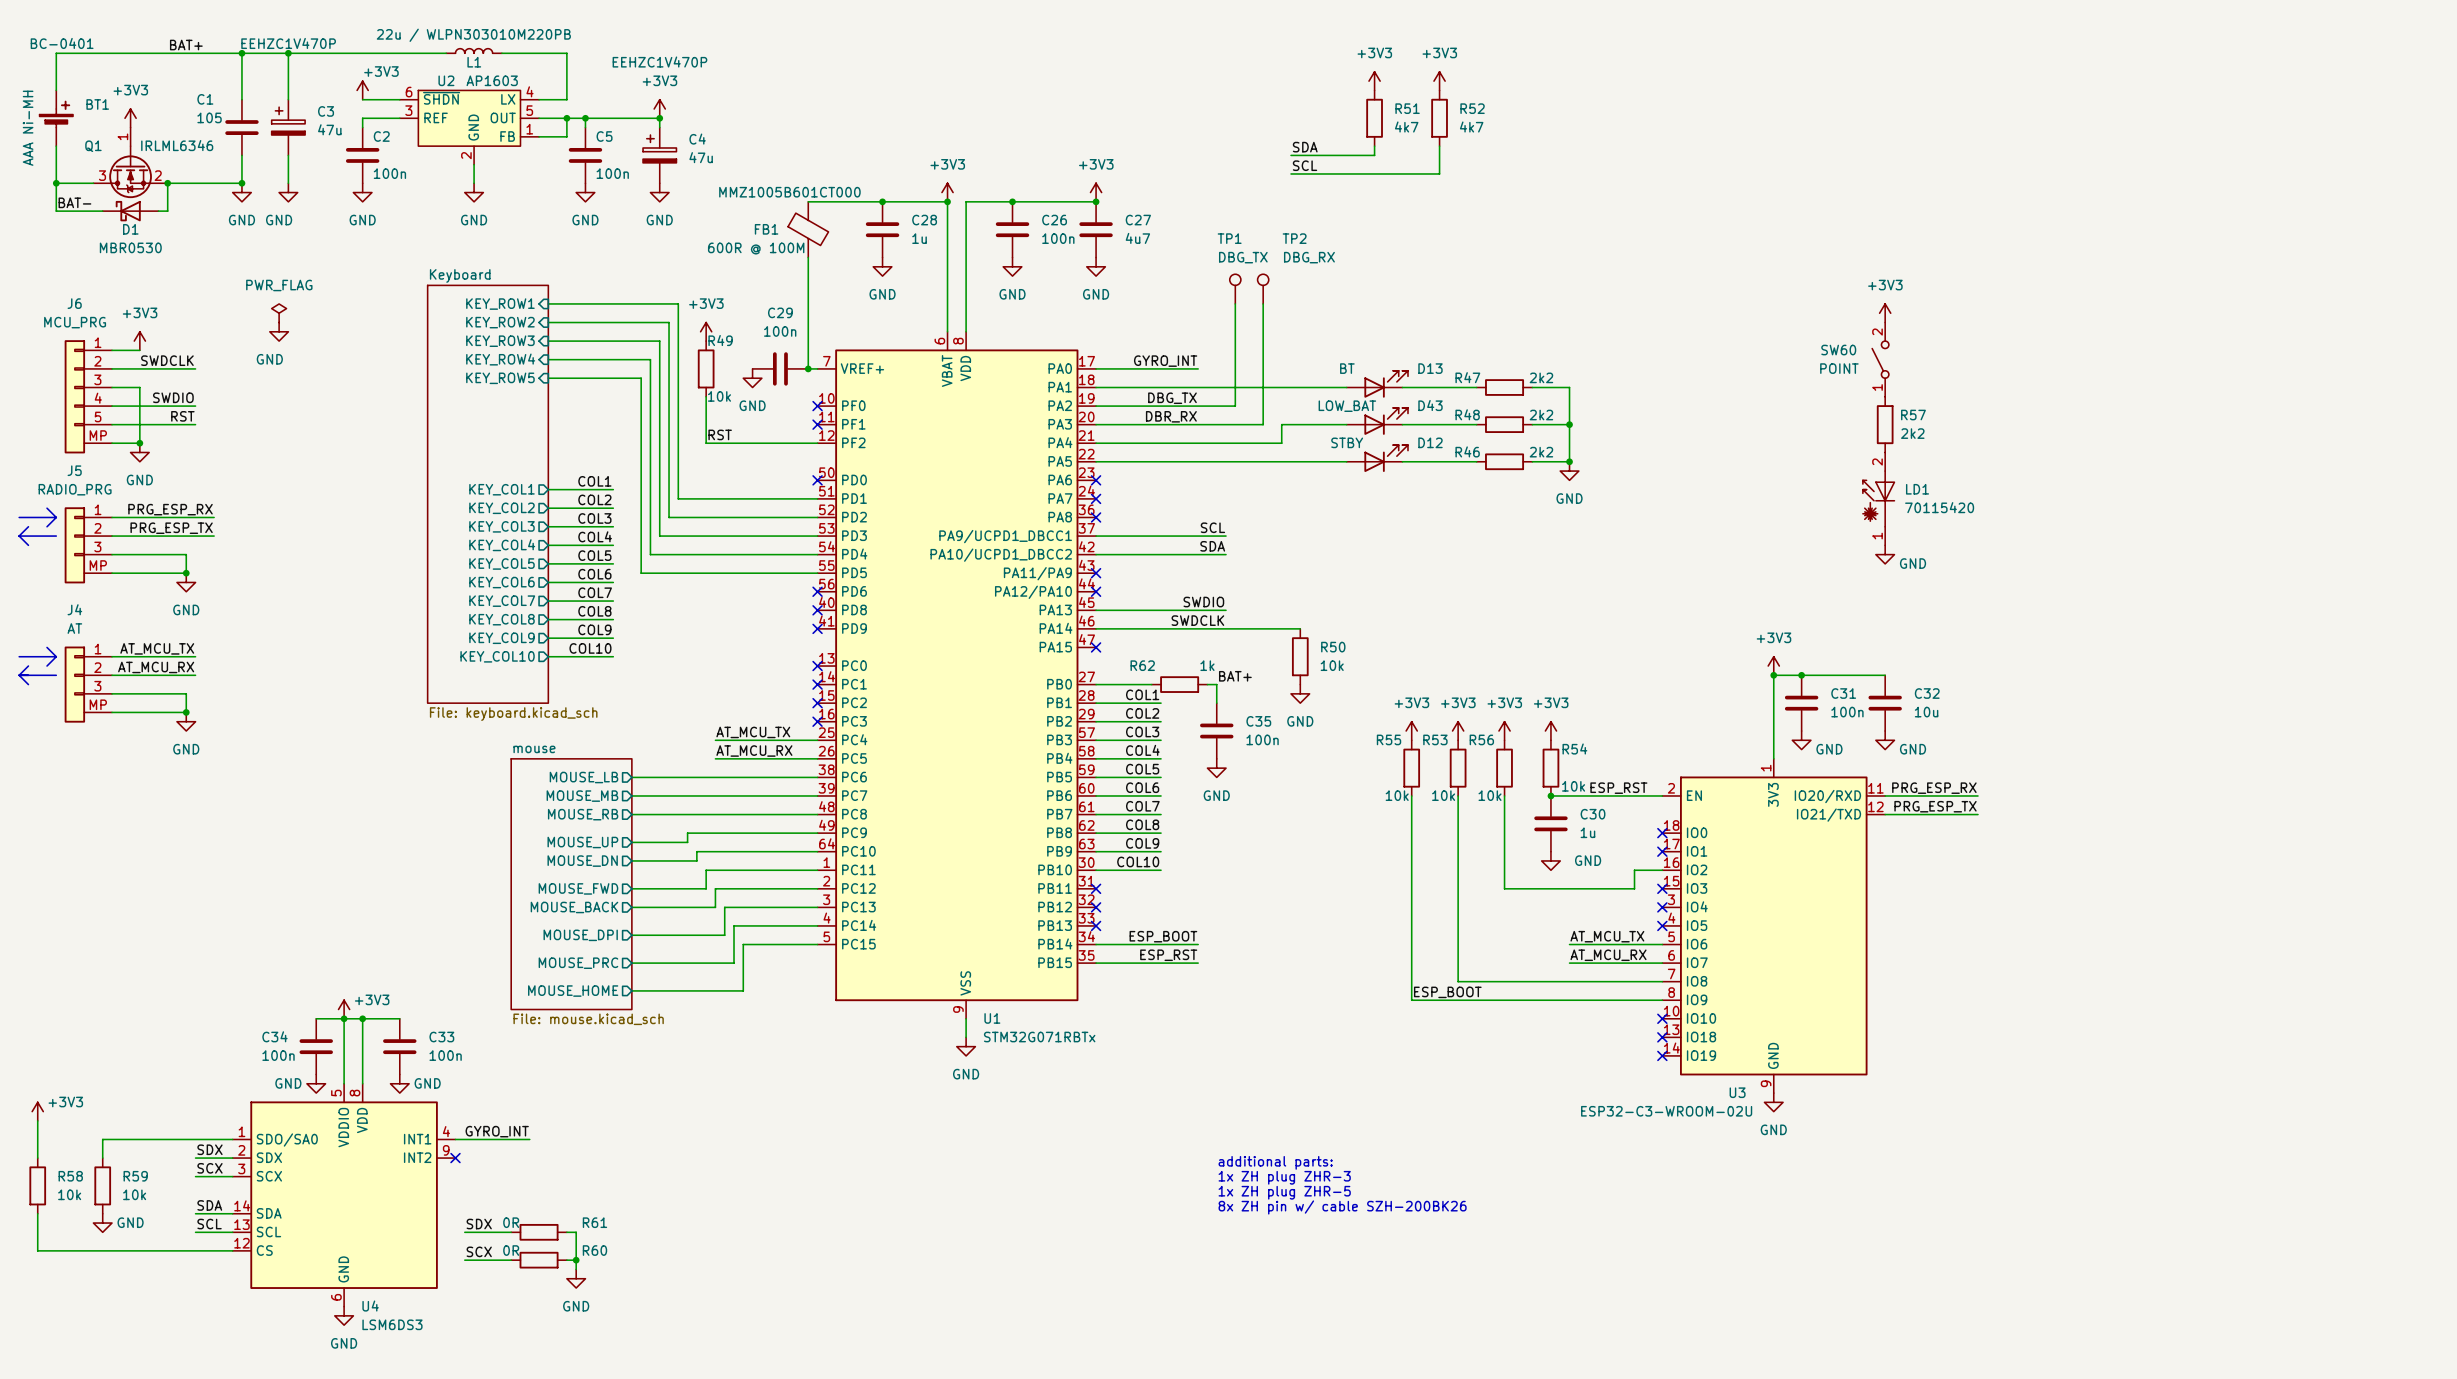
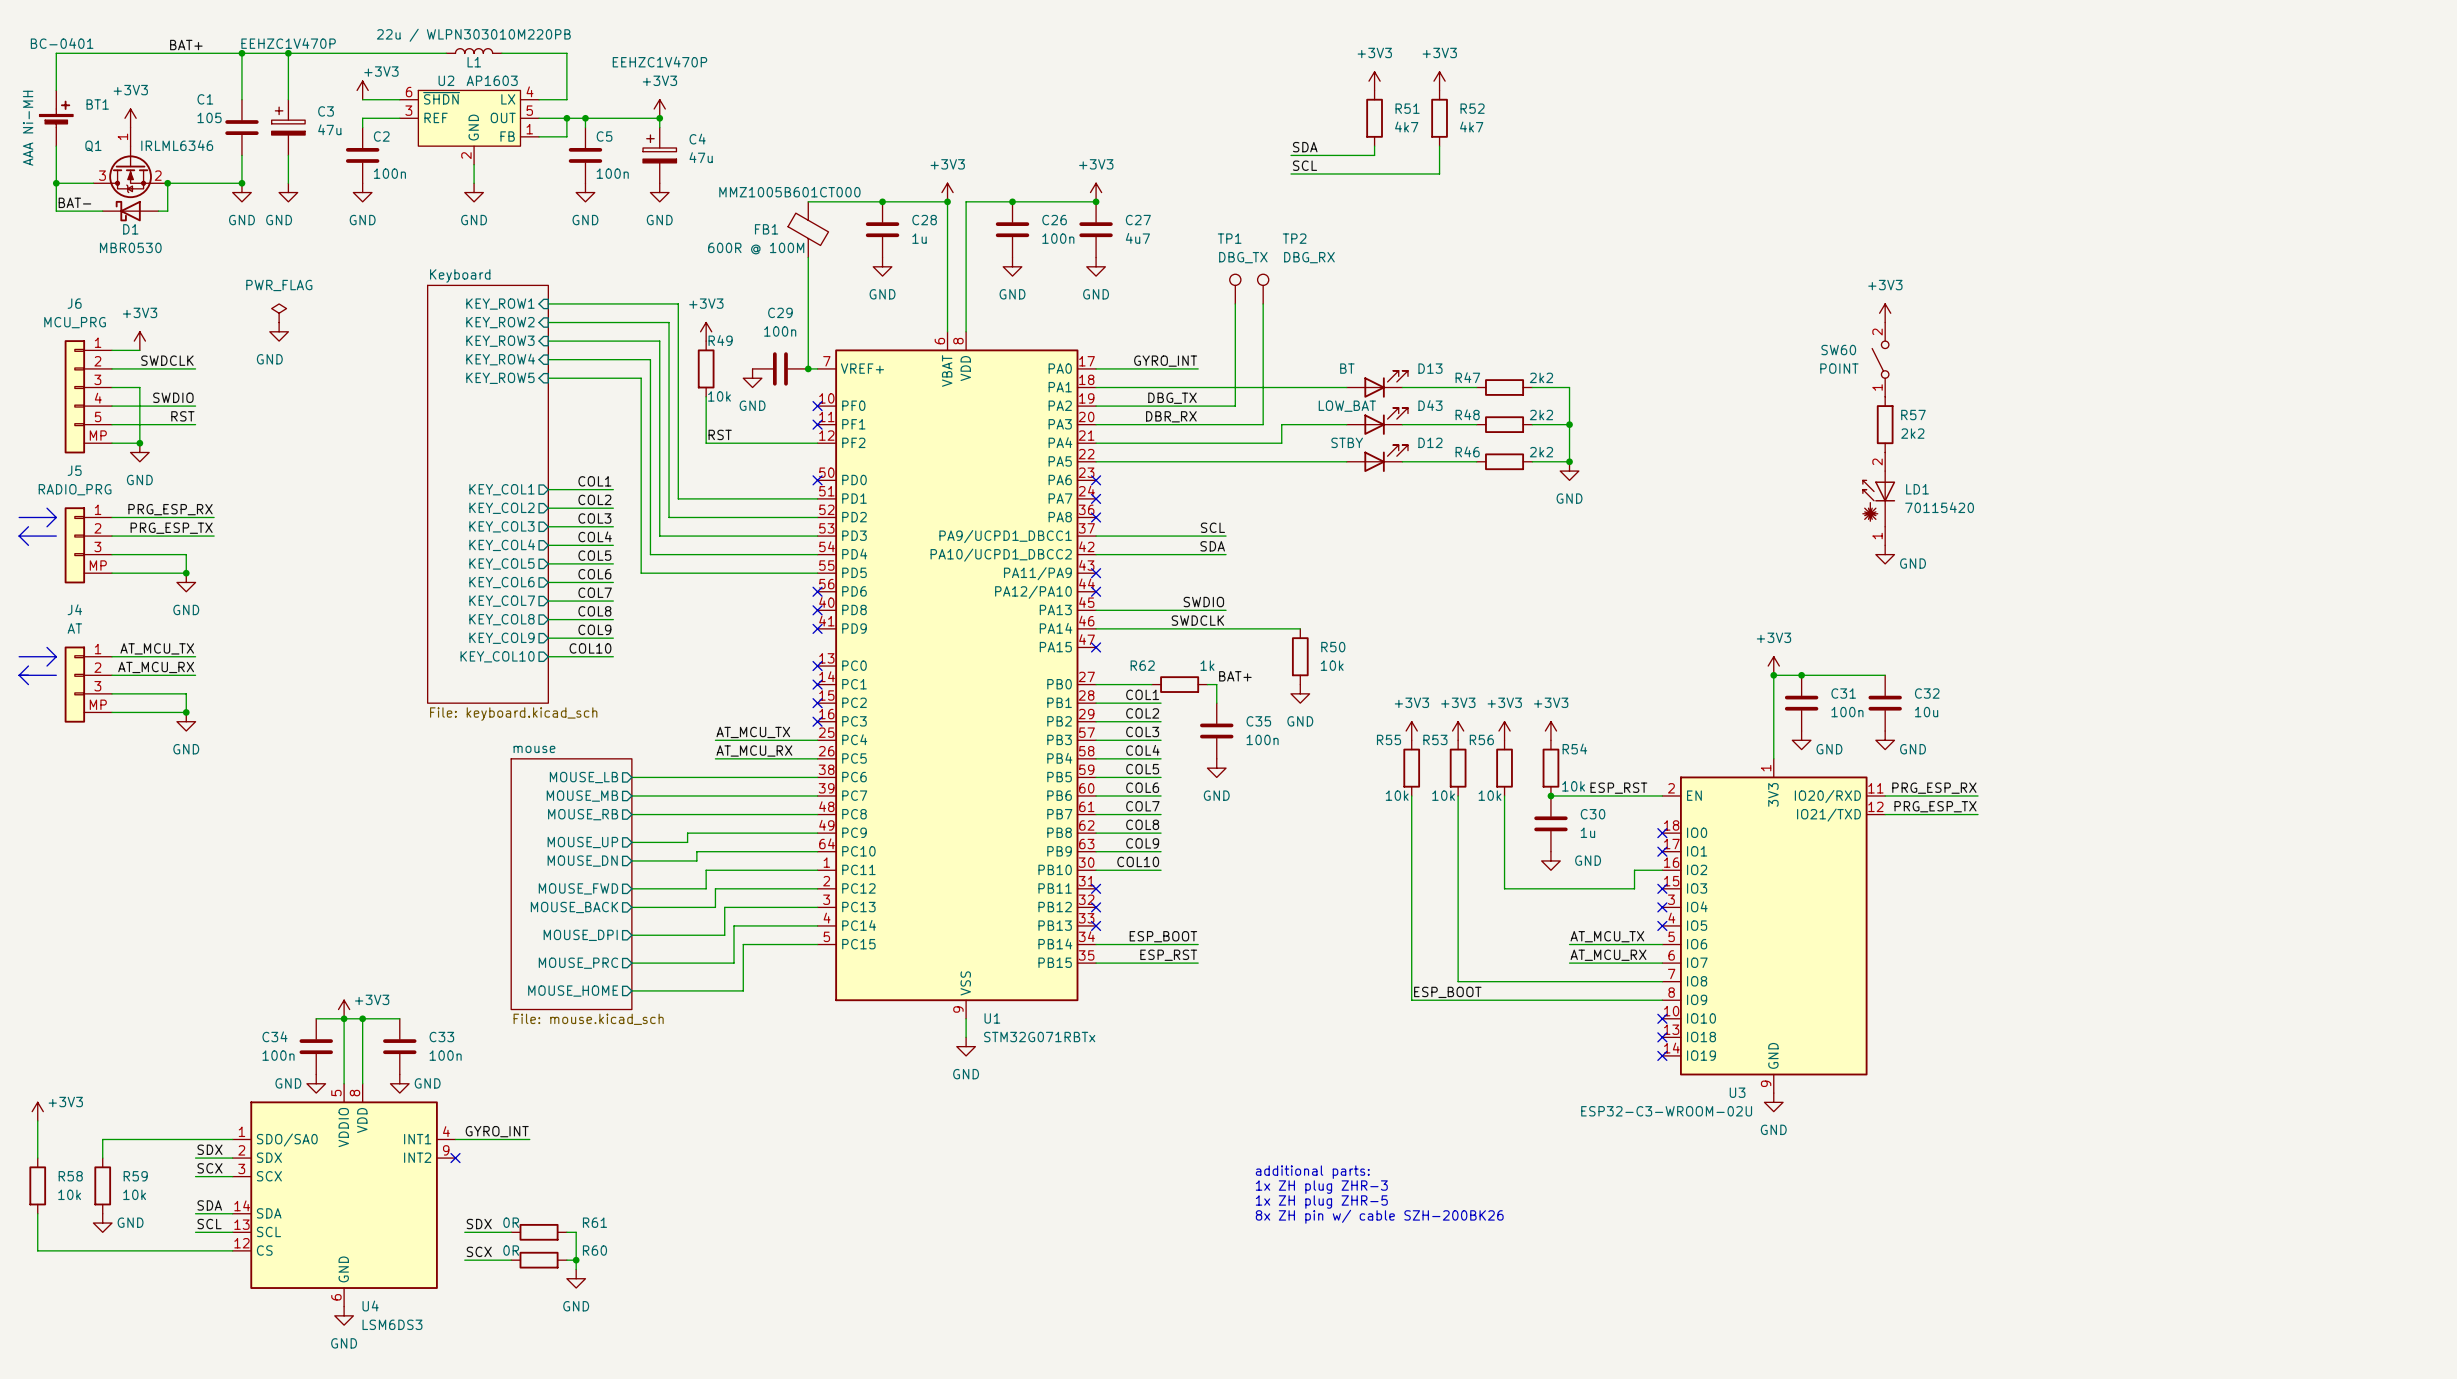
text position: additional parts: (1275, 1162) -> additional parts: (1312, 1172)
text position: 1x ZH plug ZHR-3 (1284, 1177) -> 1x ZH plug ZHR-3 (1321, 1187)
text position: 1x ZH plug ZHR-5 (1284, 1192) -> 1x ZH plug ZHR-5 (1321, 1202)
text position: 8x ZH pin w/ cable SZH-200BK26 (1342, 1207) -> 8x ZH pin w/ cable SZH-200BK26 (1379, 1216)

